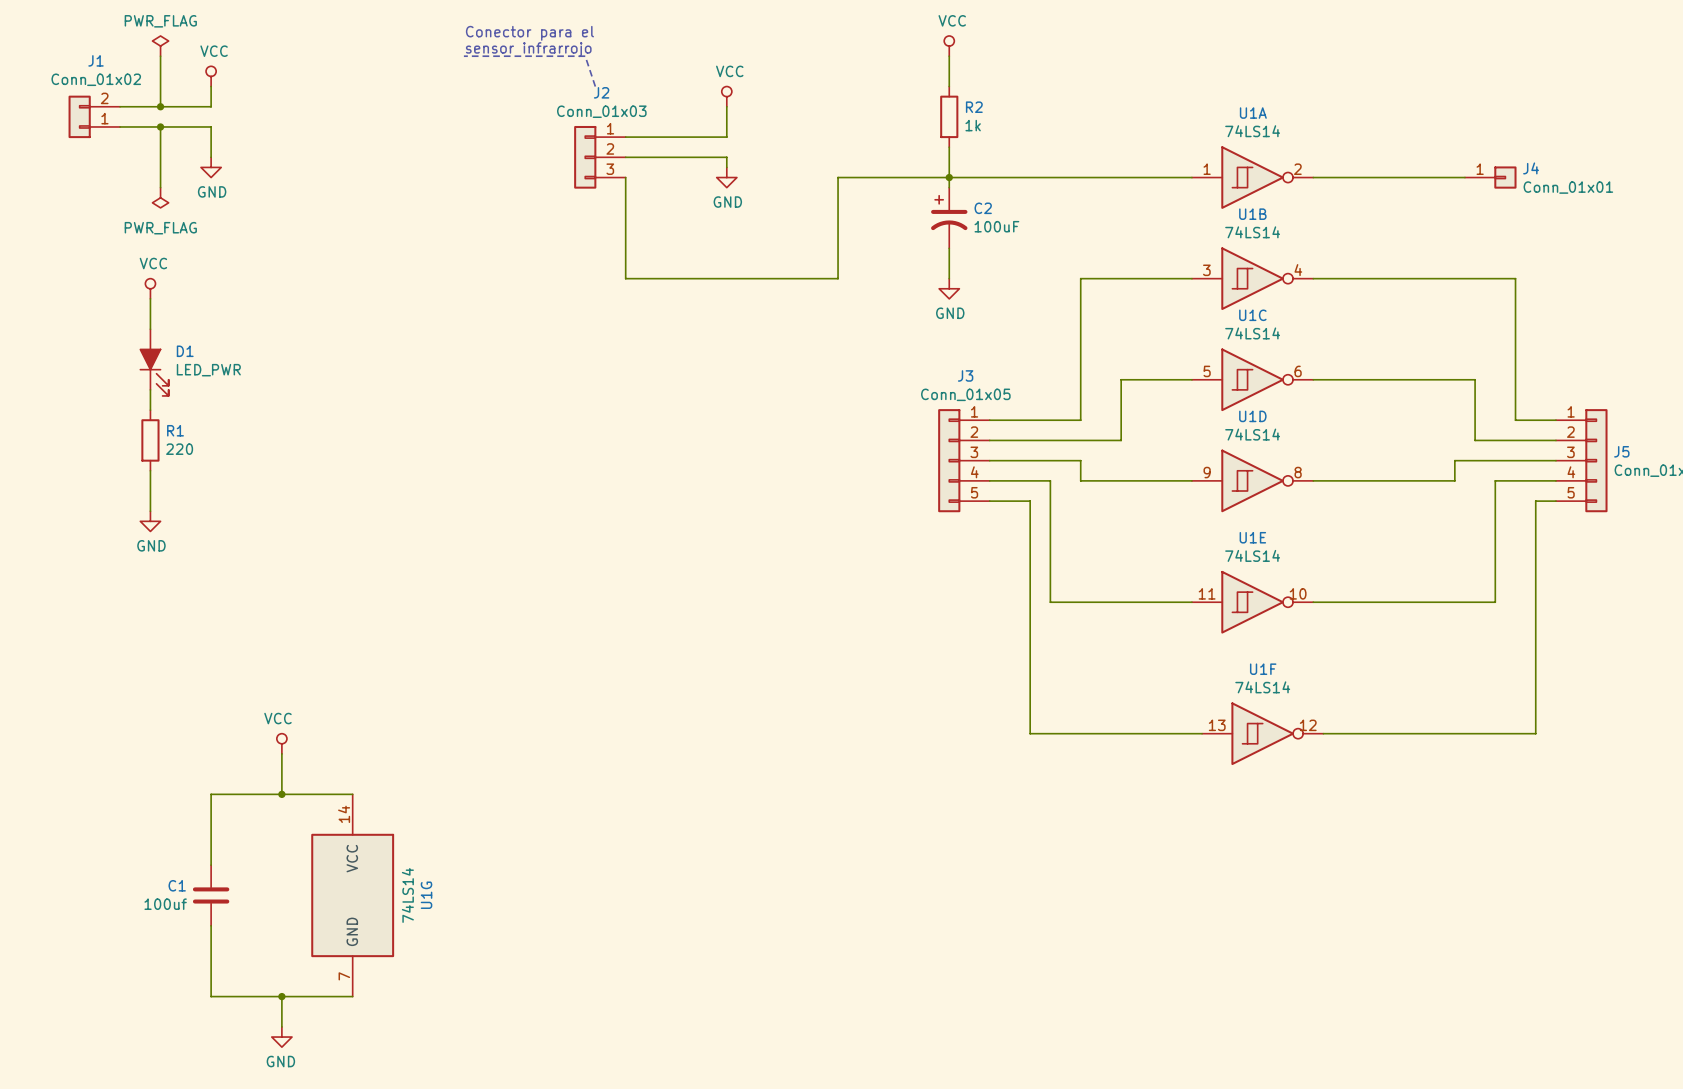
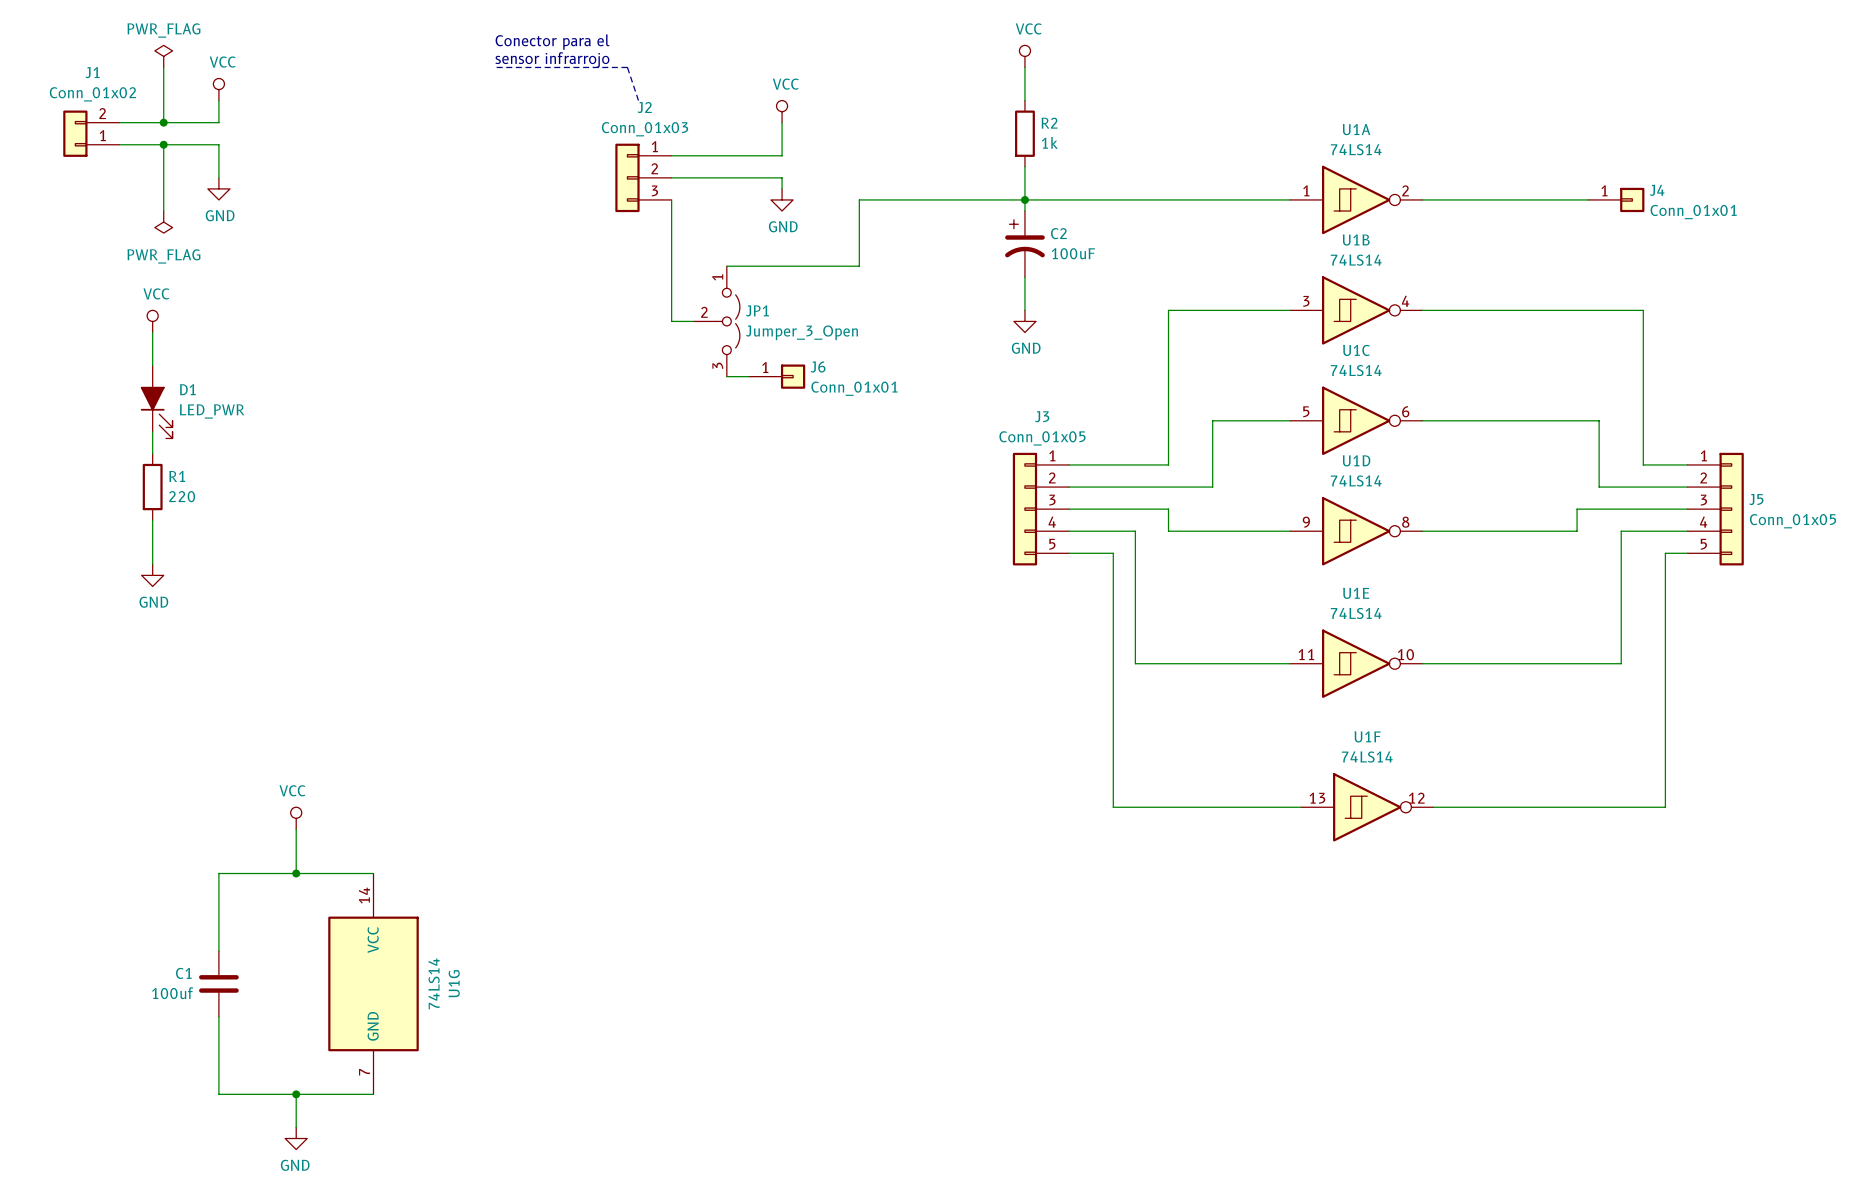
wire: (838, 177) (838, 278) (625, 278) -> (903, 199) (859, 199) (859, 266) (726, 266)
wire: none -> (671, 310) (671, 321) (693, 321)
JP1: none -> Jumper_3_Open (716, 321)
wire: none -> (726, 376) (748, 376)
J6: none -> Conn_01x01 (777, 376)

